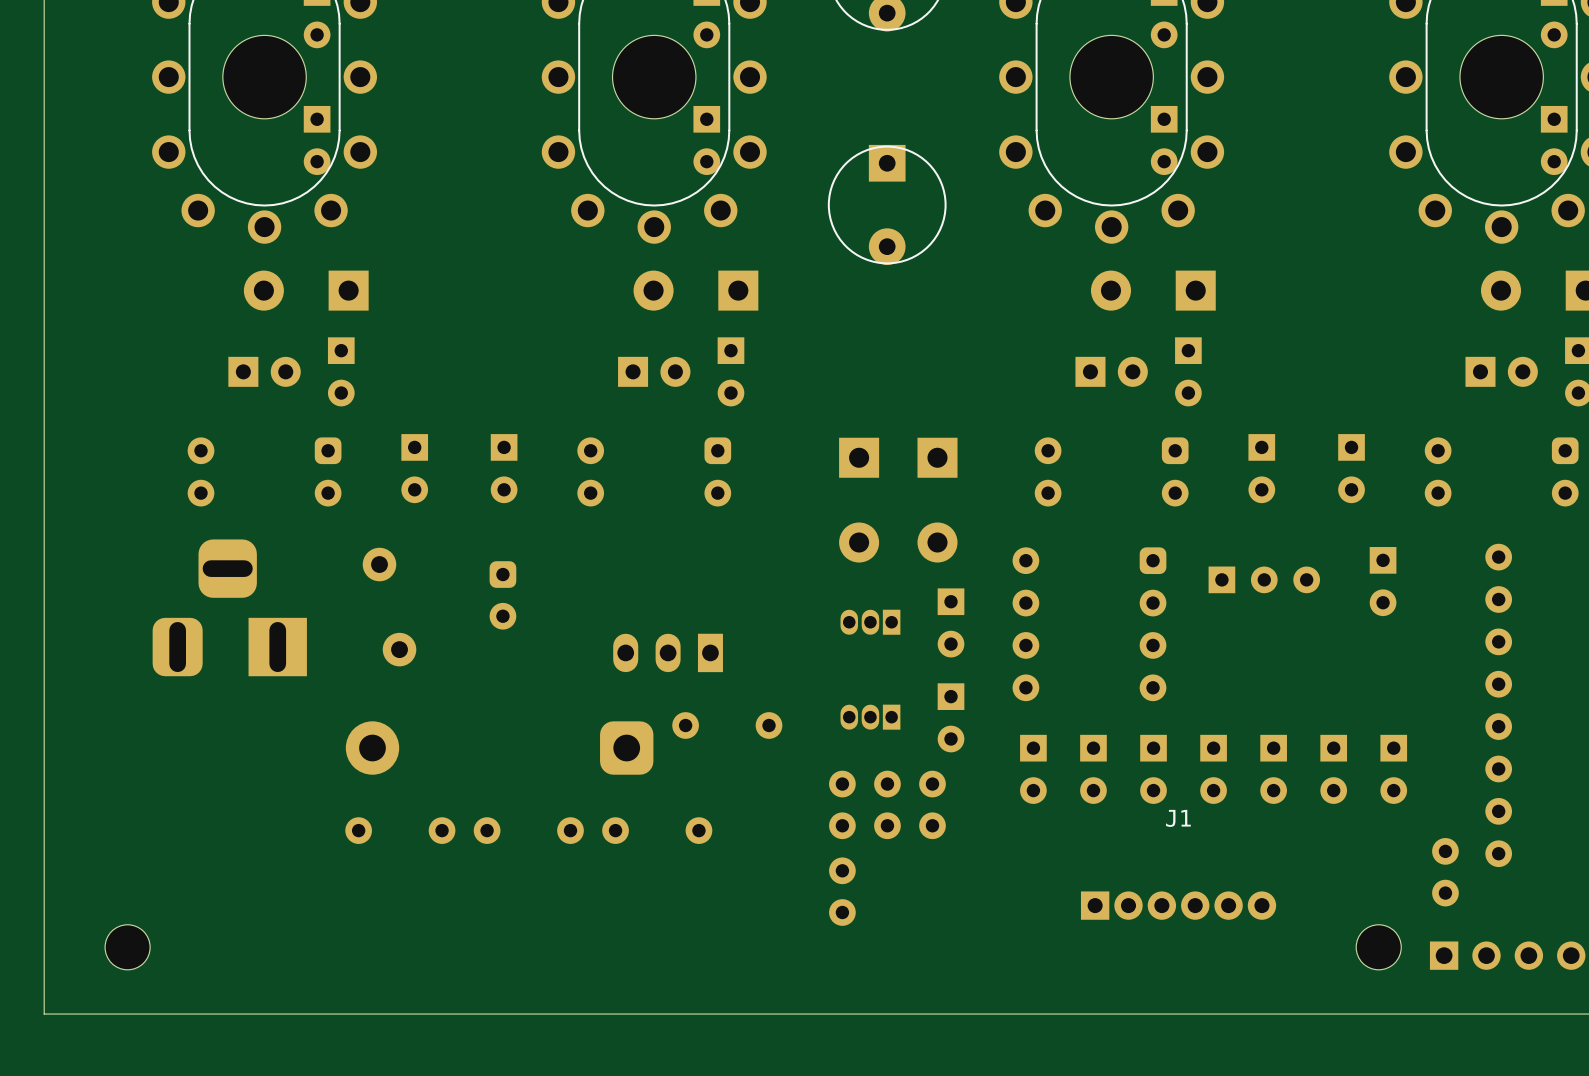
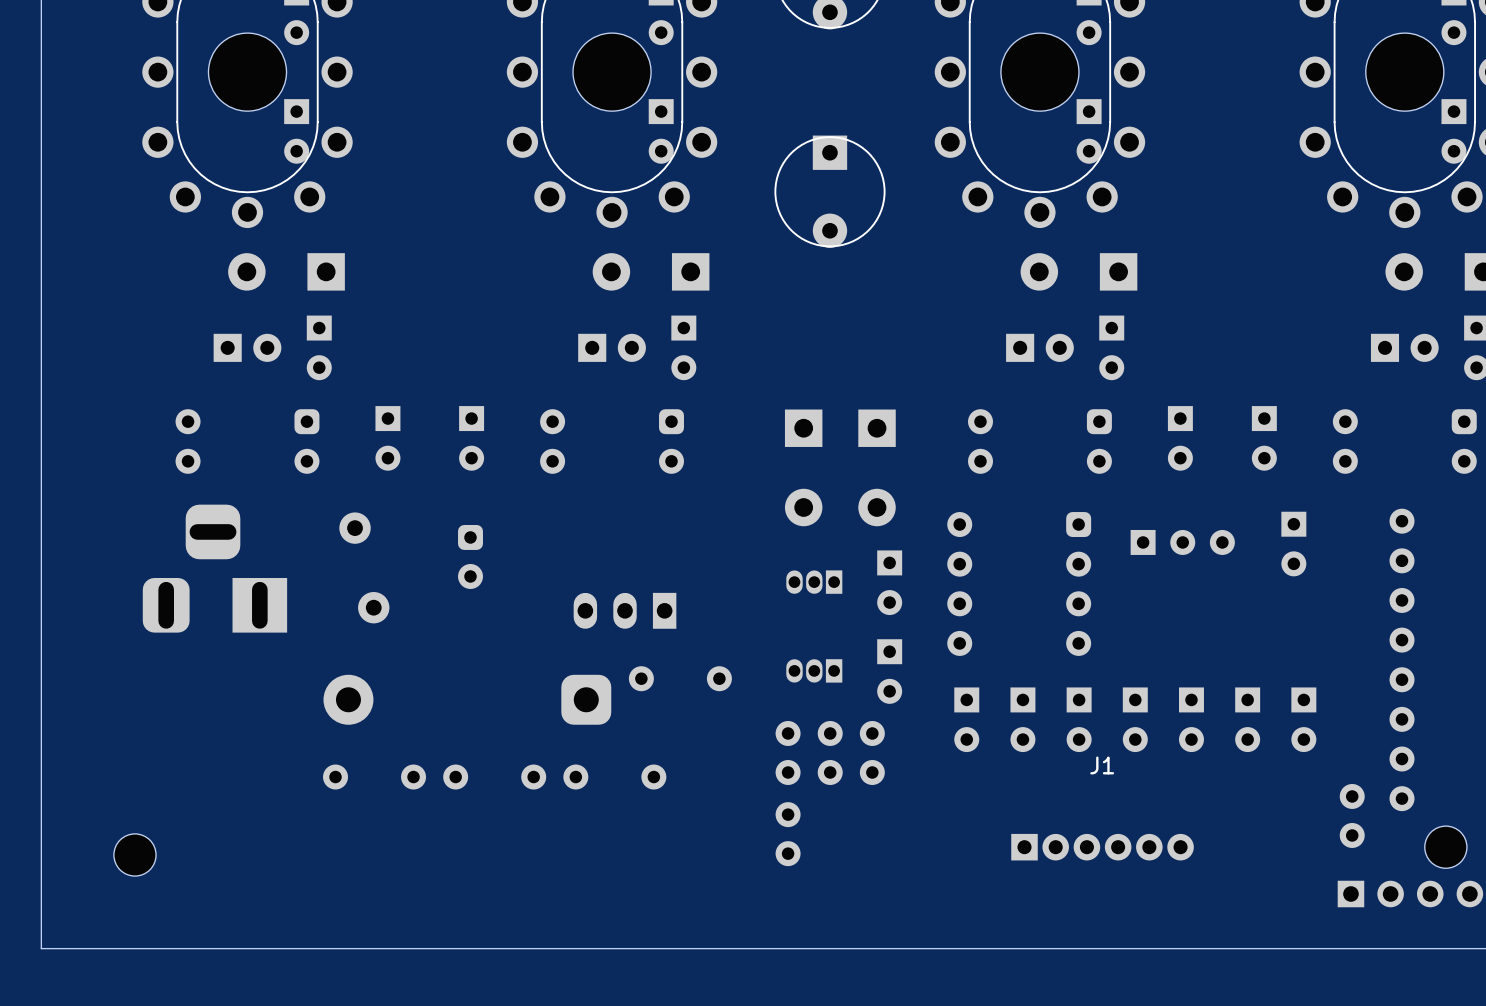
part position: (127, 947) -> (134, 854)
part position: (1378, 947) -> (1445, 847)

